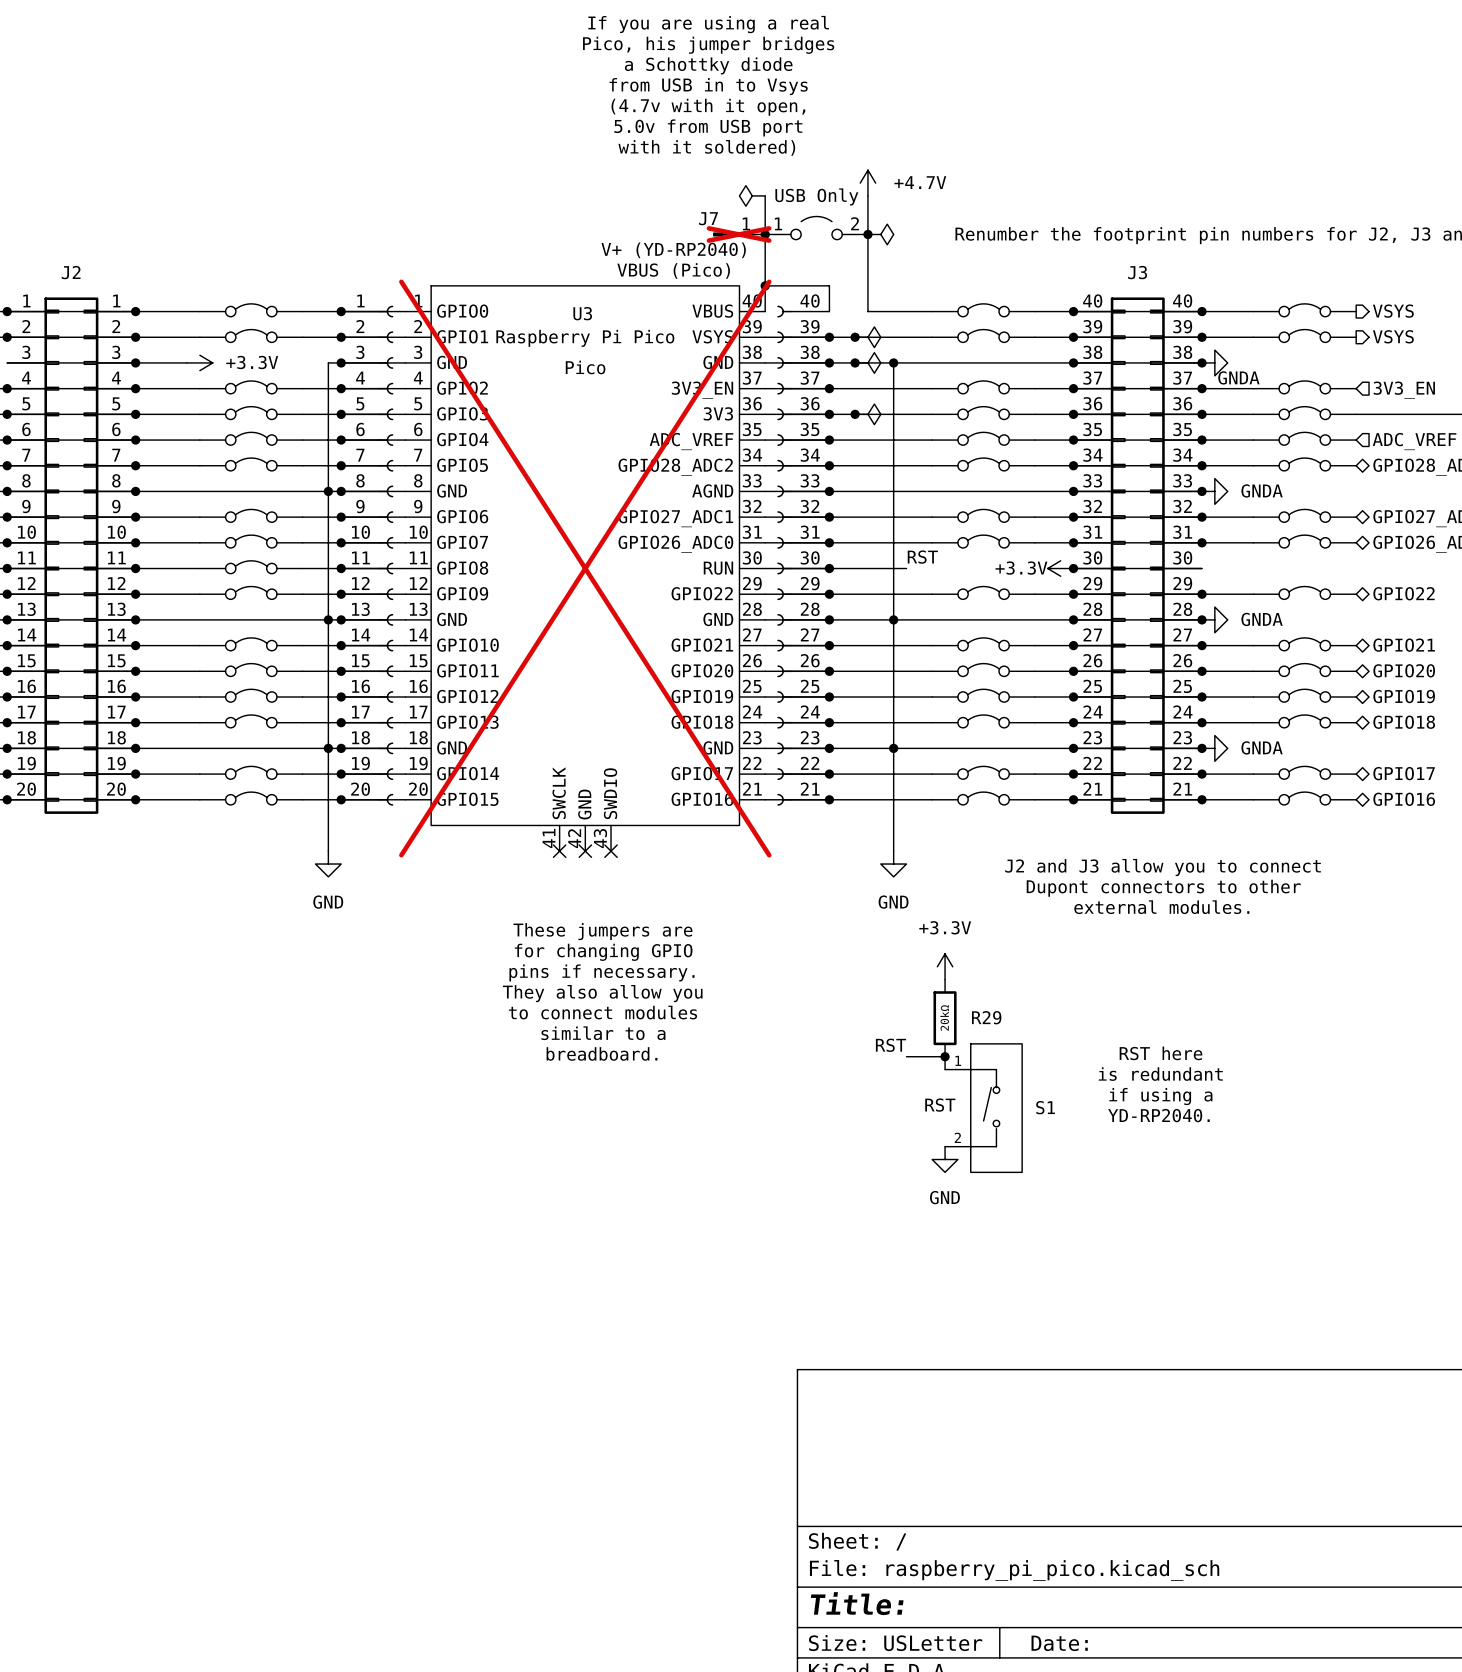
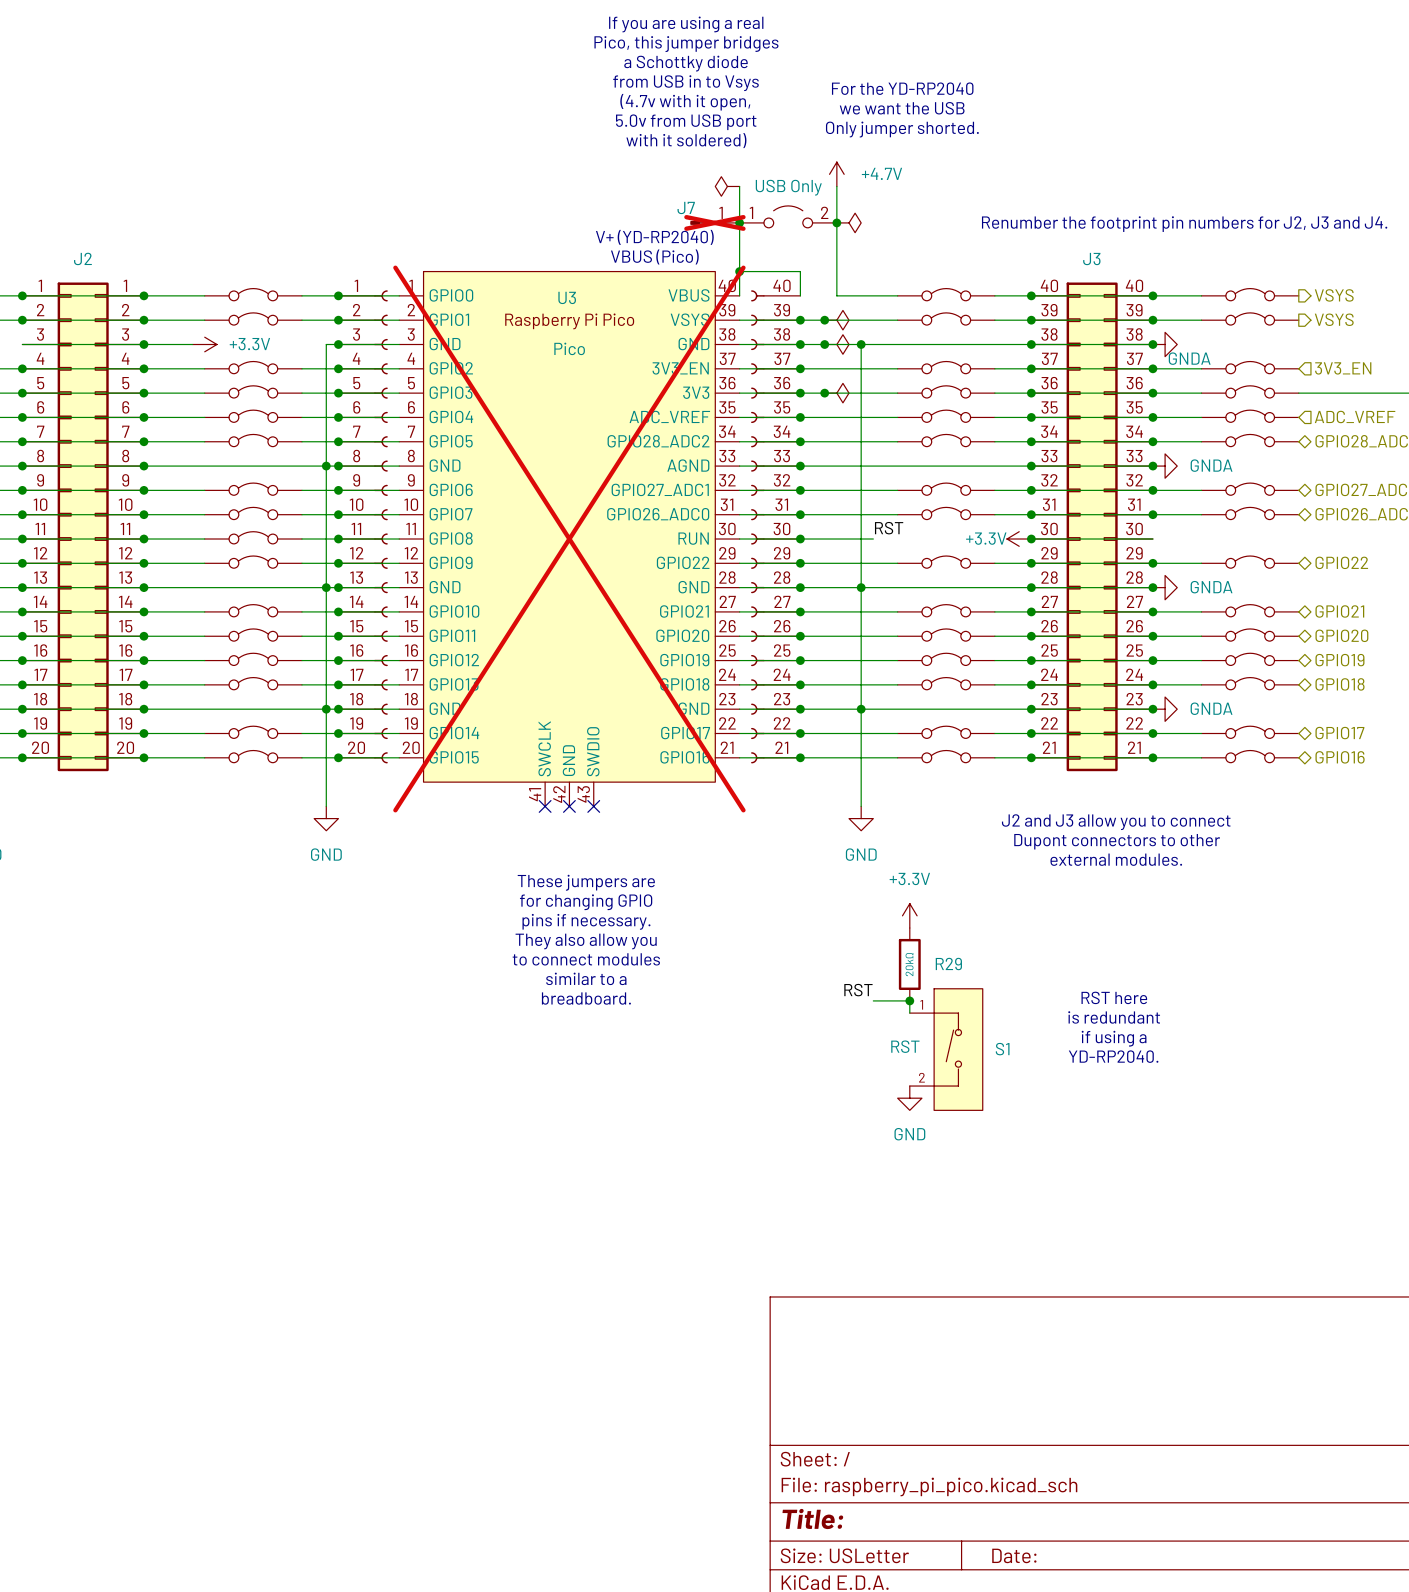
text: Pico, his jumper bridges (708, 45) -> Pico, this jumper bridges (686, 44)
text: none -> For the YD-RP2040 (902, 88)
text: none -> we want the USB (902, 108)
text: none -> Only jumper shorted. (902, 129)

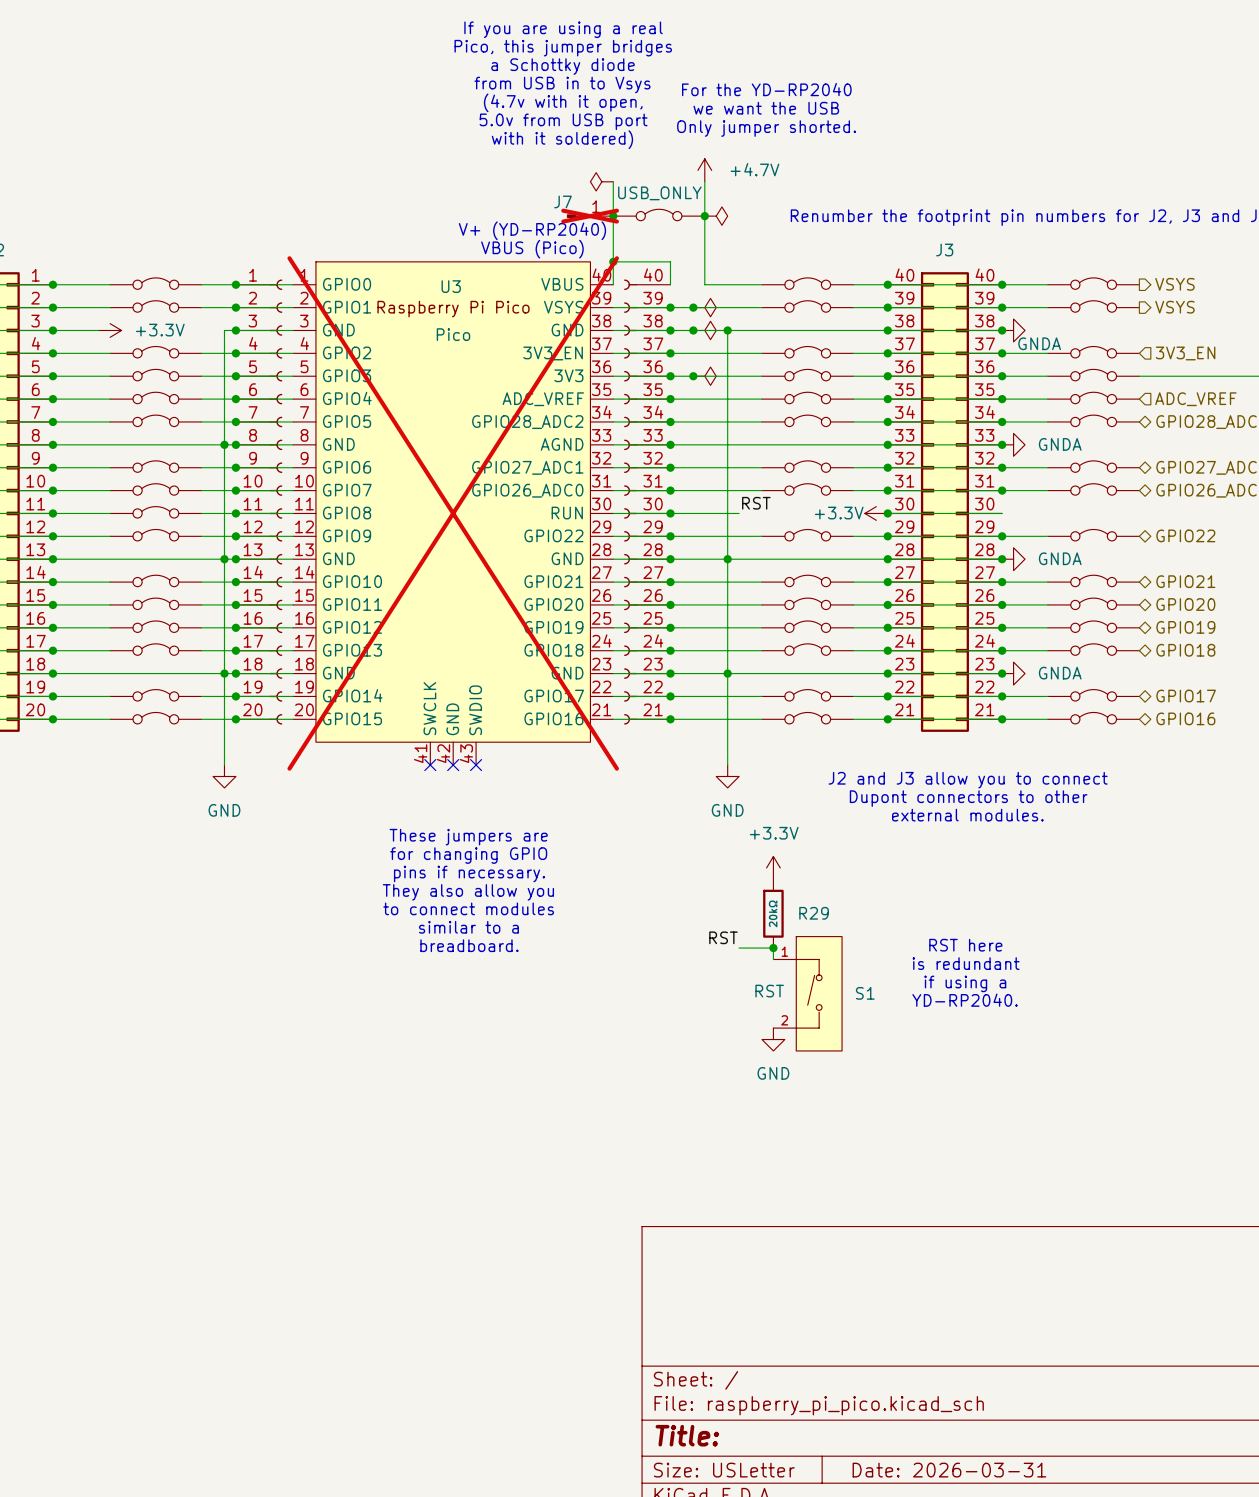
part value: USB Only (788, 187) -> USB_ONLY (659, 193)
part symbol: [739, 205, 837, 228] -> [613, 209, 705, 221]
title block: Date: (1014, 1555) -> Date: 2026-03-31 (949, 1470)

